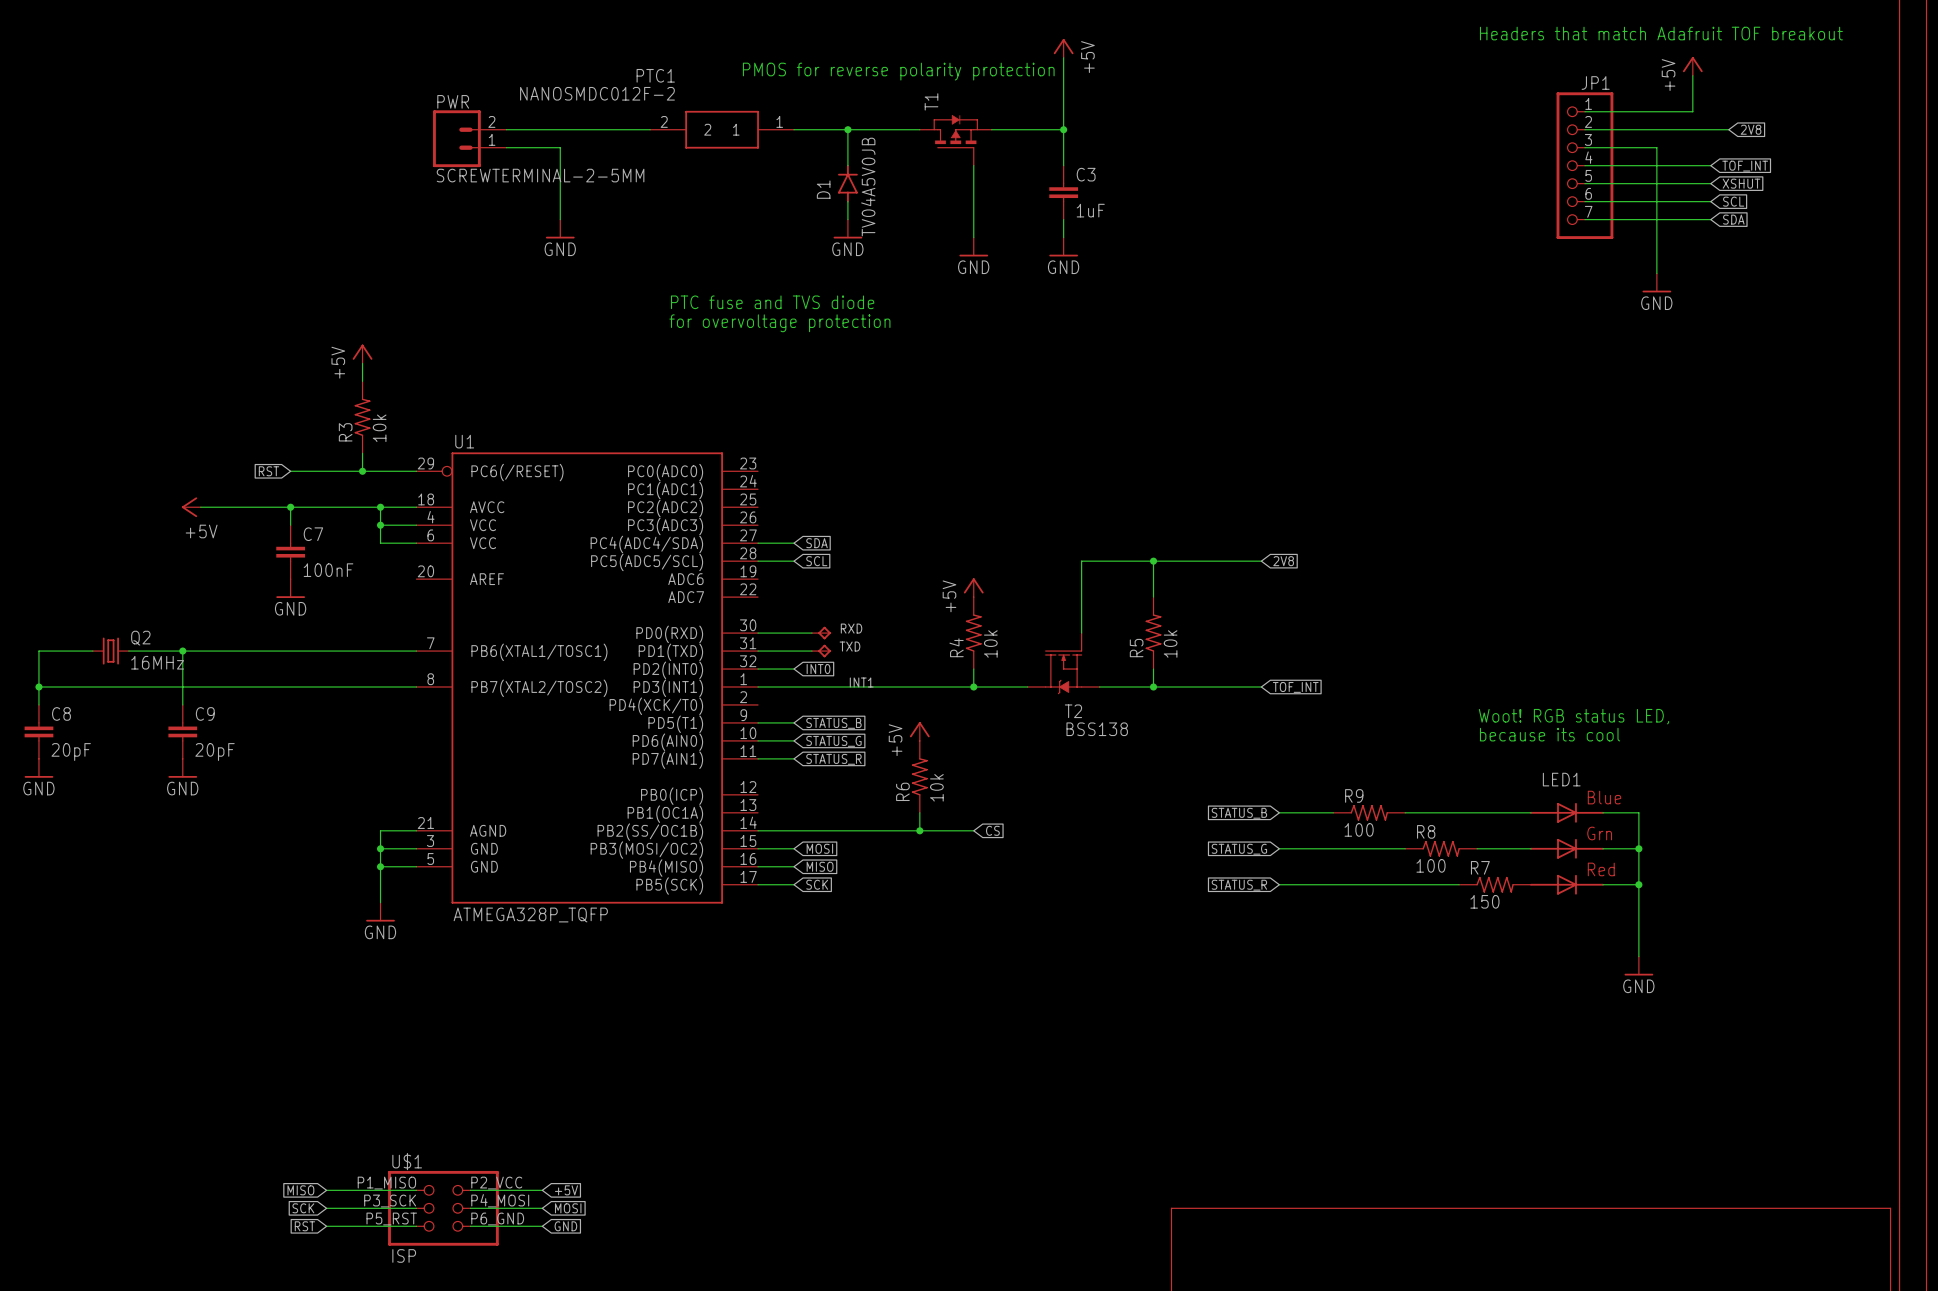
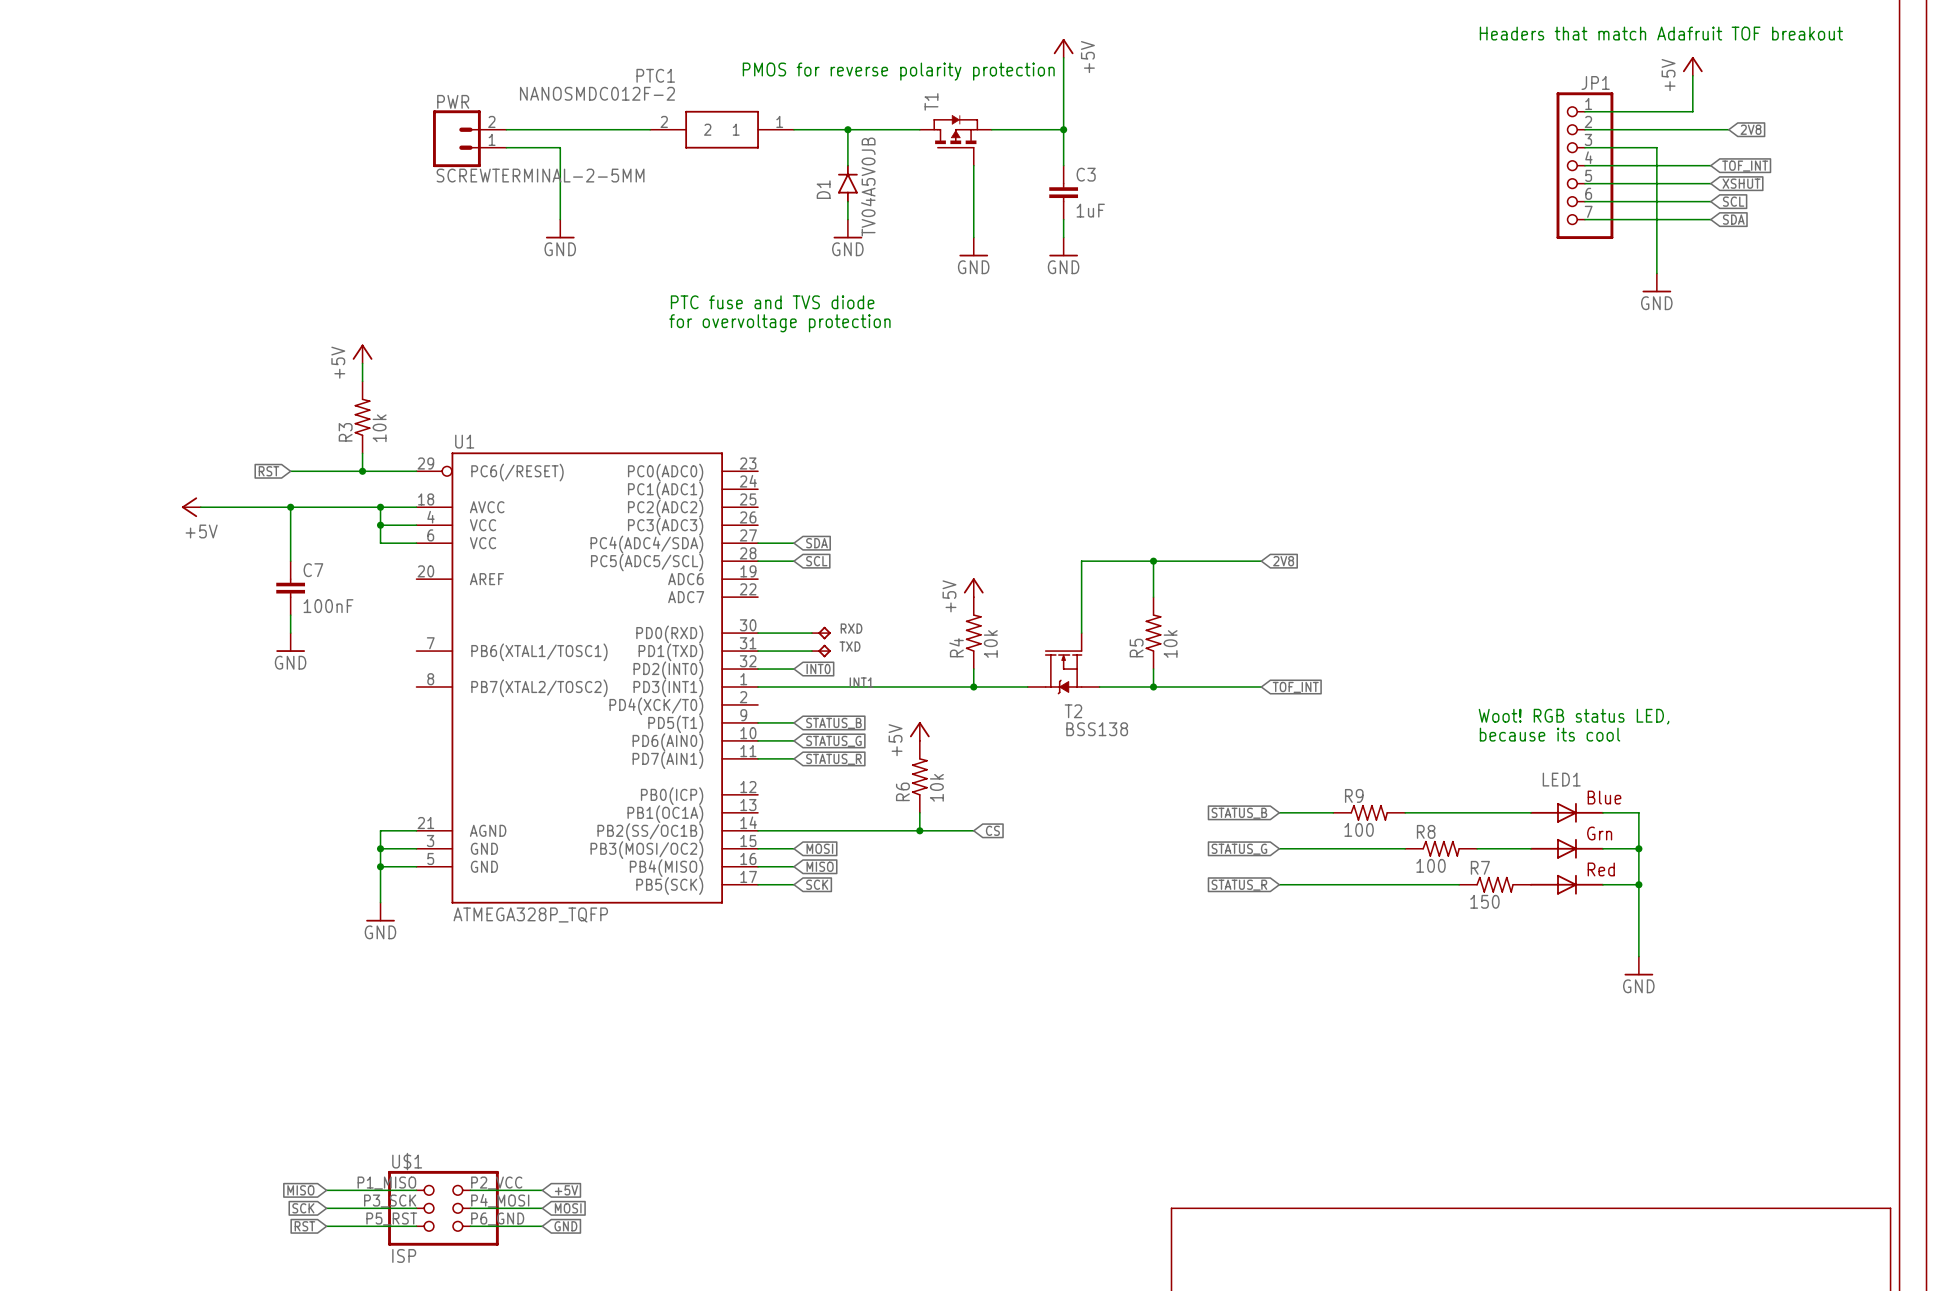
C7 position: (290, 552) -> (290, 588)
power symbol position: GND (290, 588) -> GND (290, 642)
wire: none -> (290, 615) (290, 633)
wire: (92, 651) (38, 651) (38, 704) -> none
Q2: 16MHz (110, 651) -> none
wire: (128, 651) (416, 651) -> none
wire: (182, 651) (182, 704) -> none
junction: (182, 651) -> none
wire: (38, 687) (416, 687) -> none
junction: (38, 687) -> none
C8: 20pF (38, 731) -> none
C9: 20pF (182, 731) -> none
power symbol: GND (38, 768) -> none
power symbol: GND (182, 768) -> none

